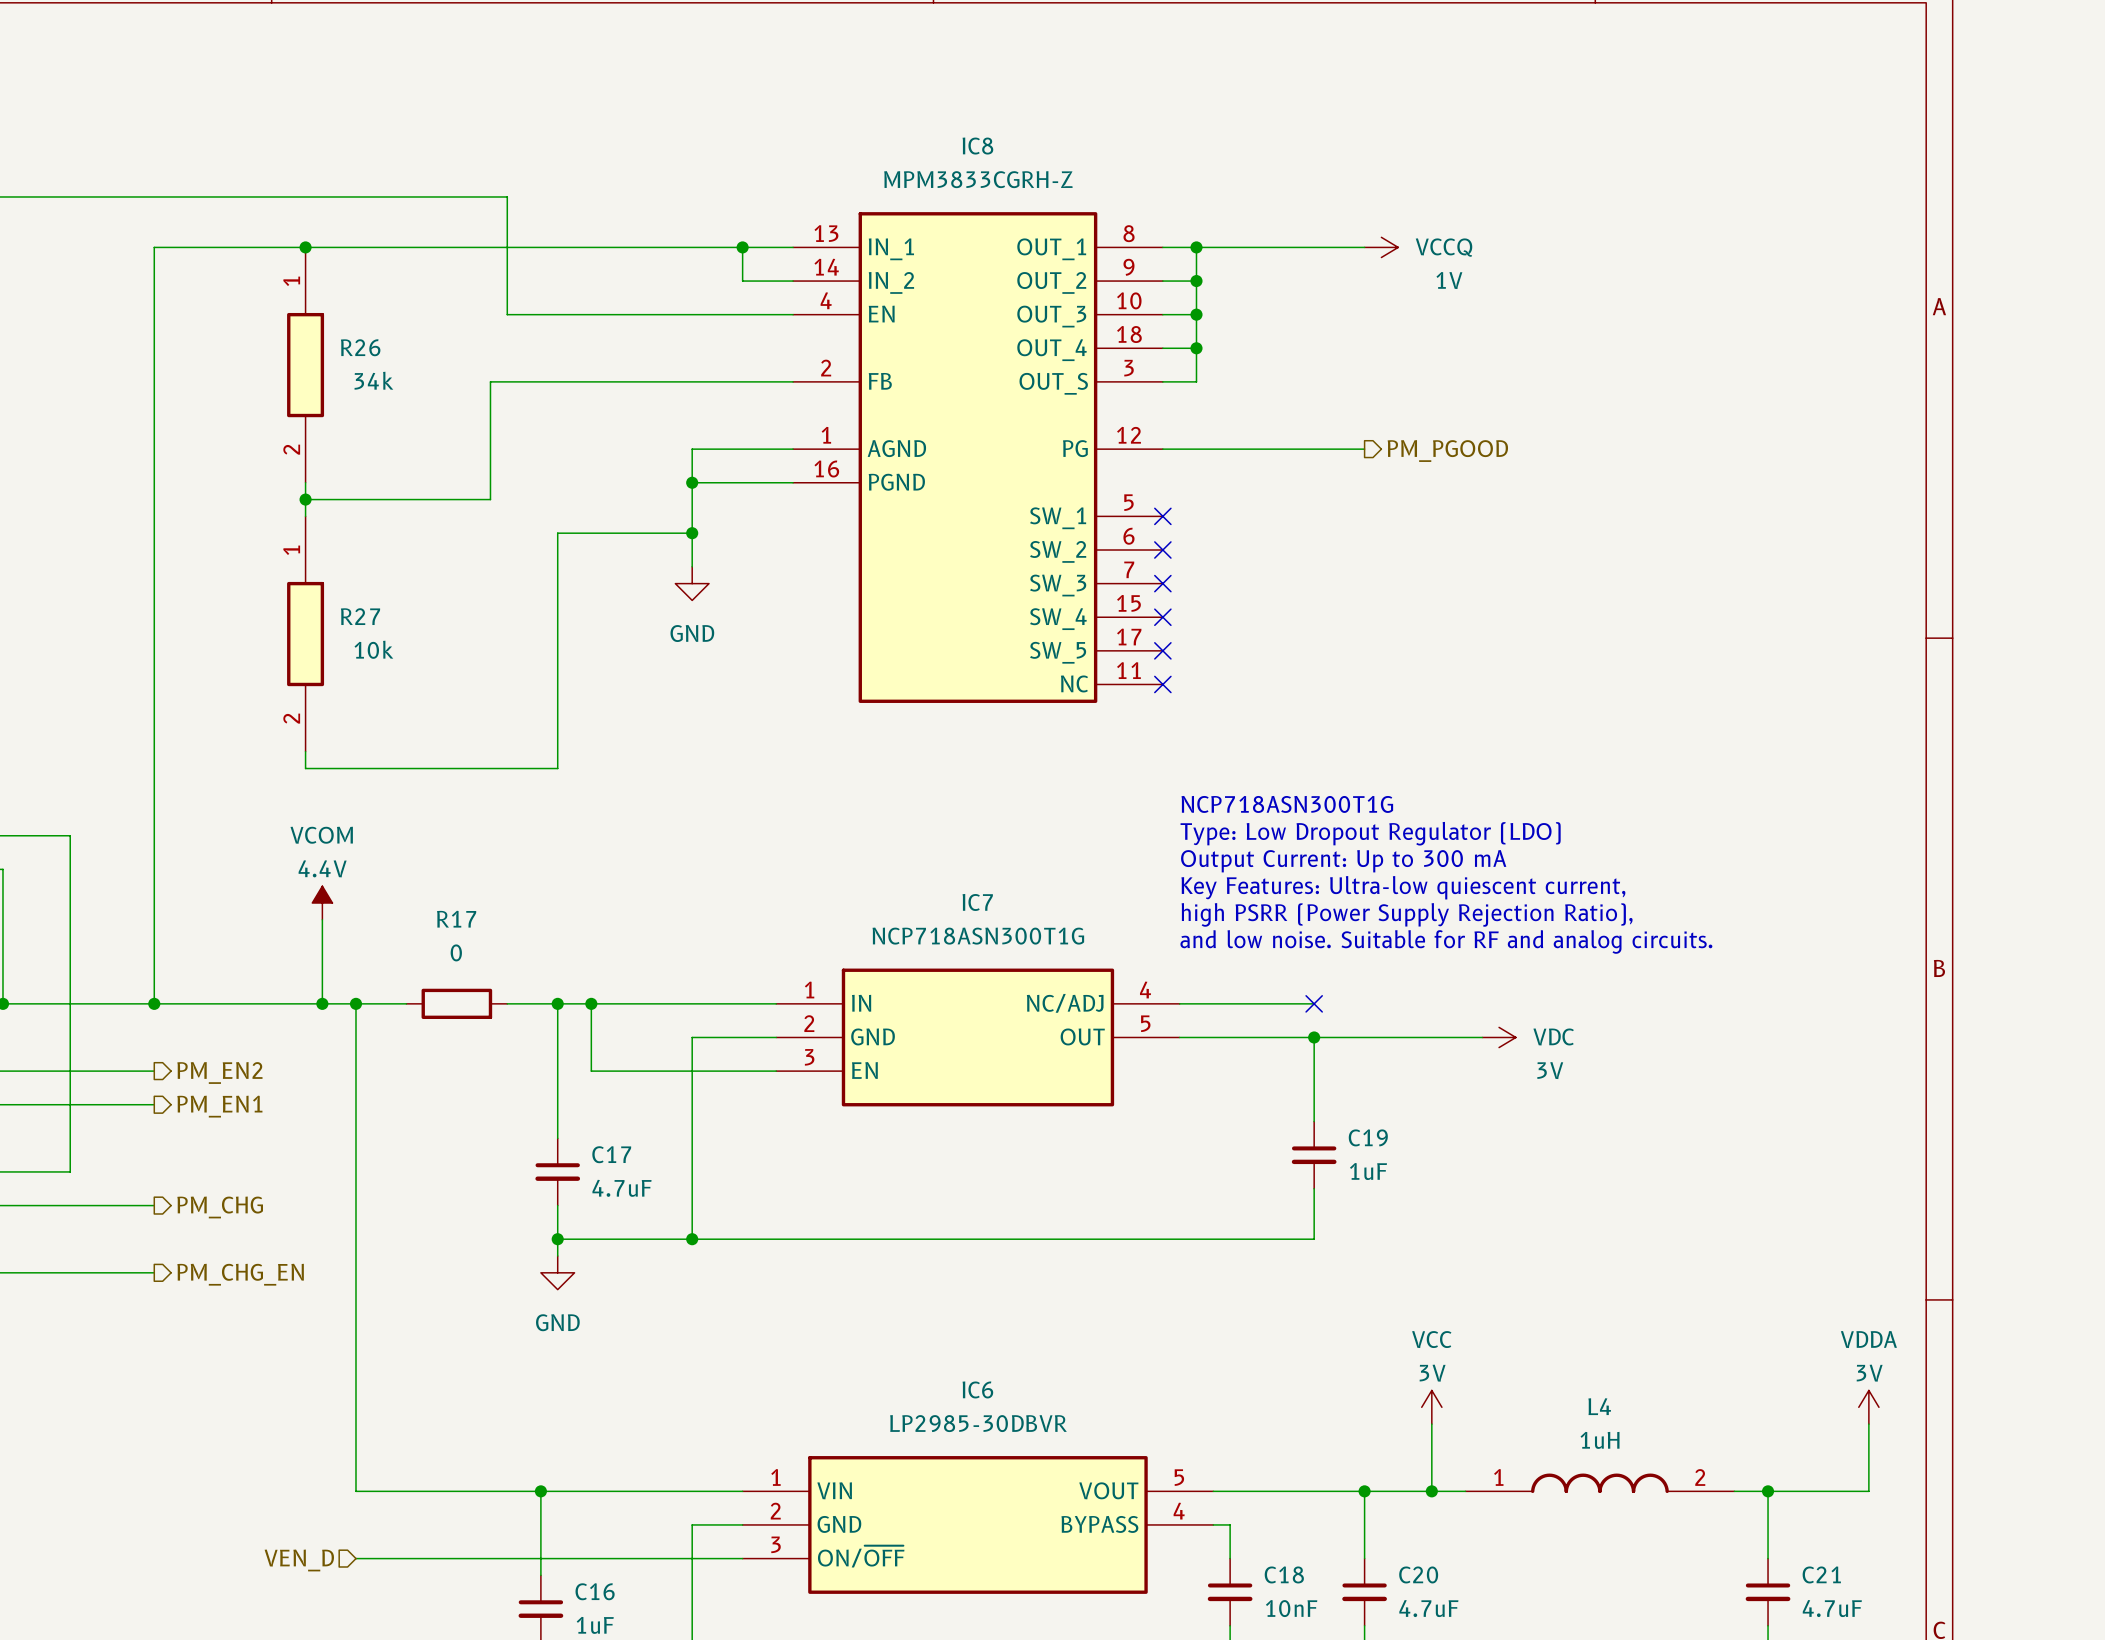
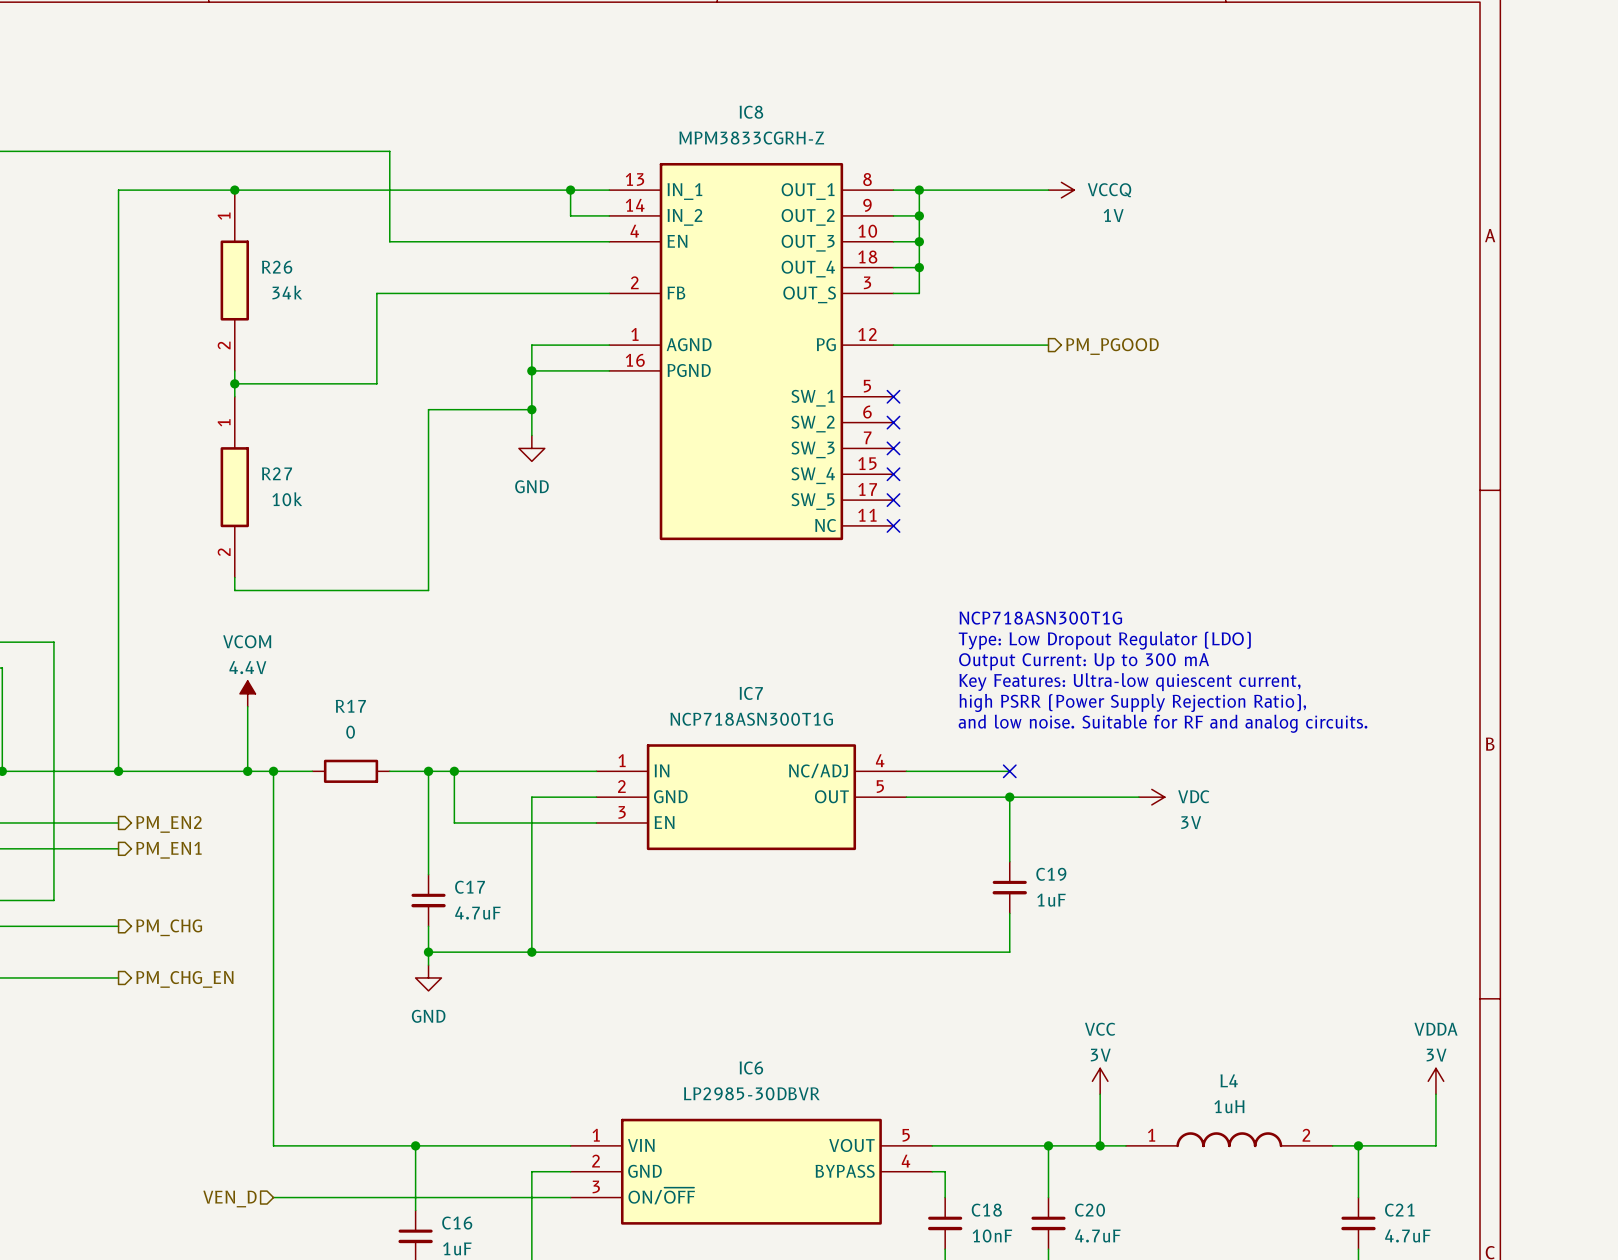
text position: NCP718ASN300T1G (1287, 804) -> NCP718ASN300T1G (1040, 618)
text position: Type: Low Dropout Regulator (LDO) (1370, 833) -> Type: Low Dropout Regulator (LDO) (1104, 640)
text position: Output Current: Up to 300 mA (1343, 861) -> Output Current: Up to 300 mA (1084, 661)
text position: Key Features: Ultra-low quiescent current, (1403, 887) -> Key Features: Ultra-low quiescent current, (1129, 682)
text position: high PSRR (Power Supply Rejection Ratio), (1407, 914) -> high PSRR (Power Supply Rejection Ratio), (1132, 702)
text position: and low noise. Suitable for RF and analog circuits. (1446, 941) -> and low noise. Suitable for RF and analog circuits. (1163, 723)

